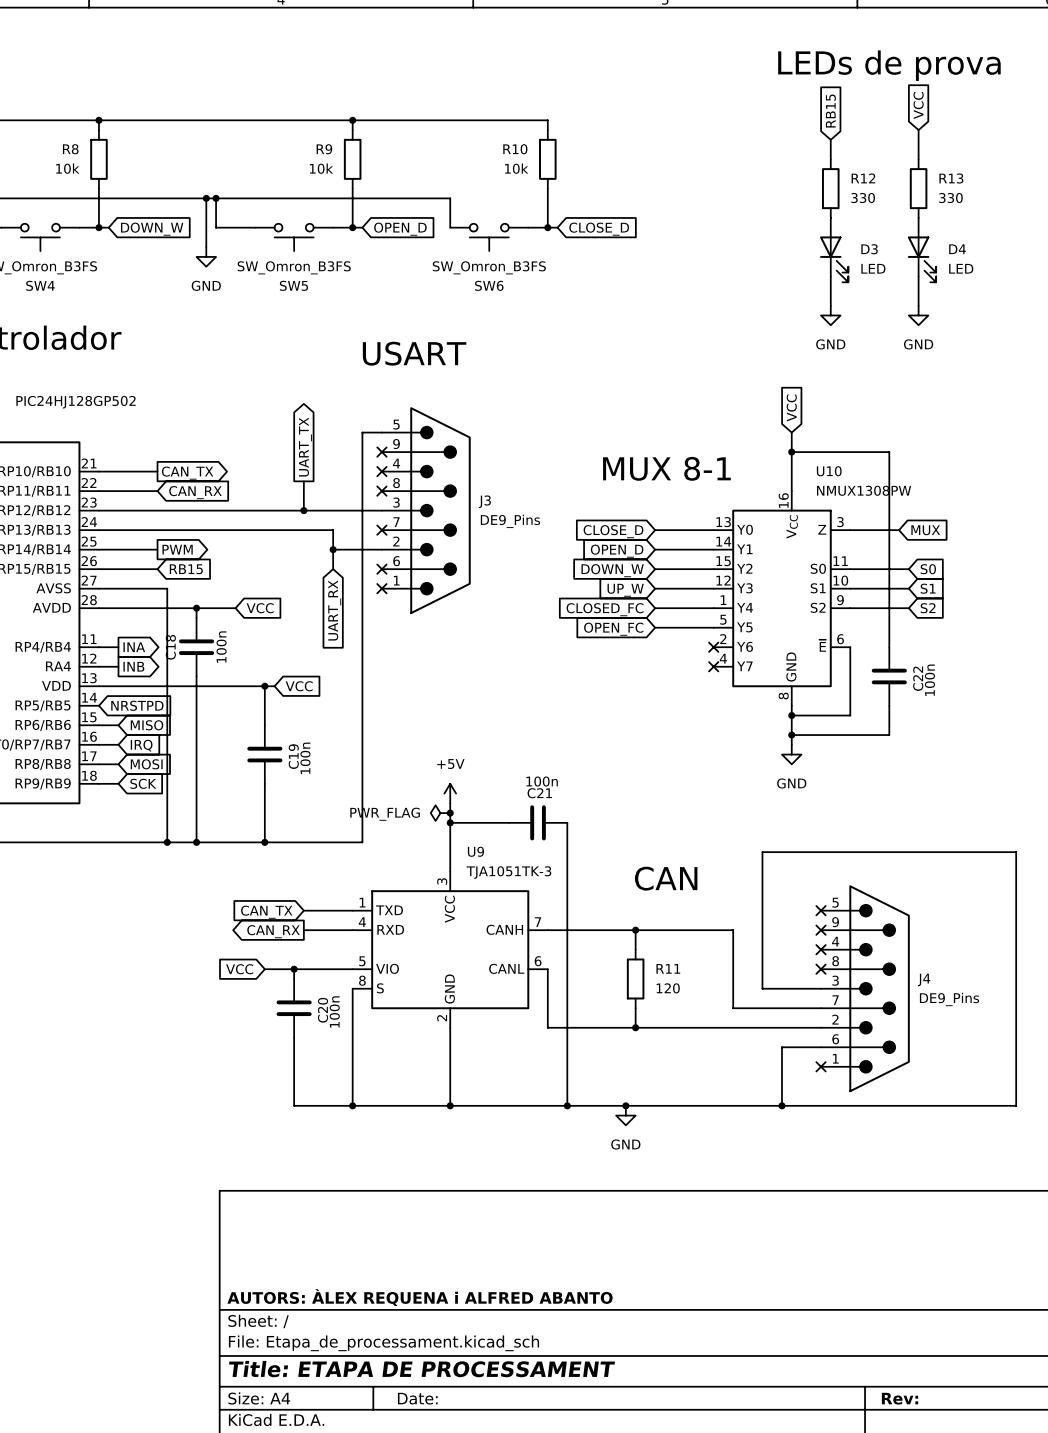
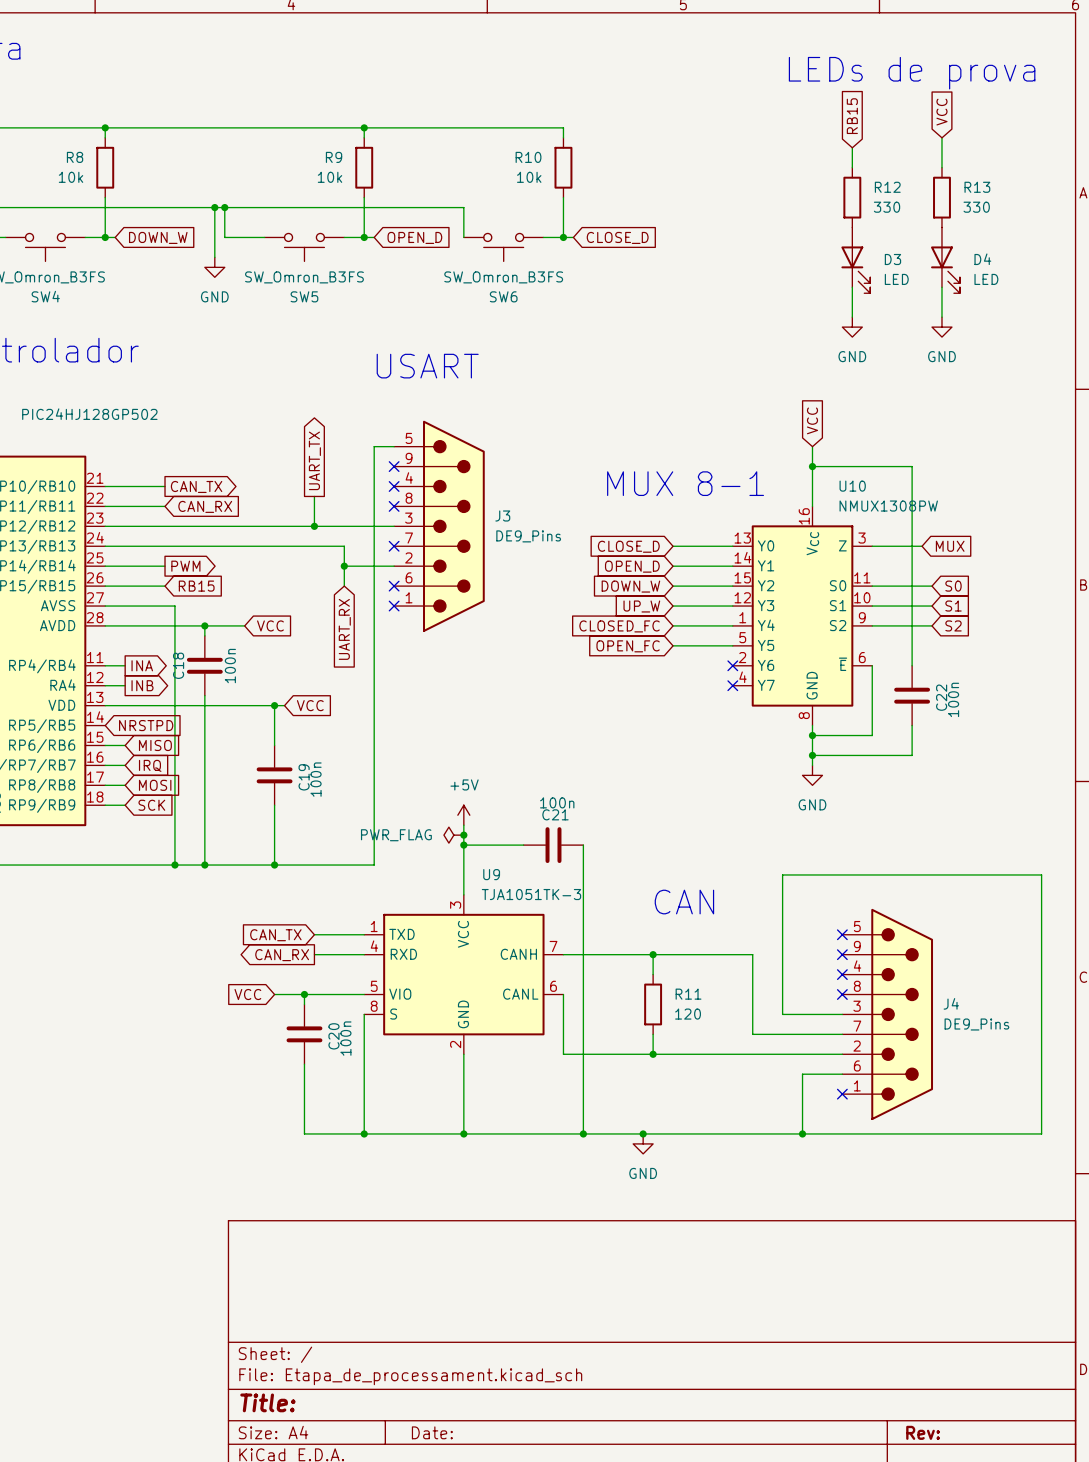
title block: AUTORS: ÀLEX REQUENA i ALFRED ABANTO (420, 1297) -> none
title block: Title: ETAPA DE PROCESSAMENT (422, 1369) -> Title: (267, 1402)

